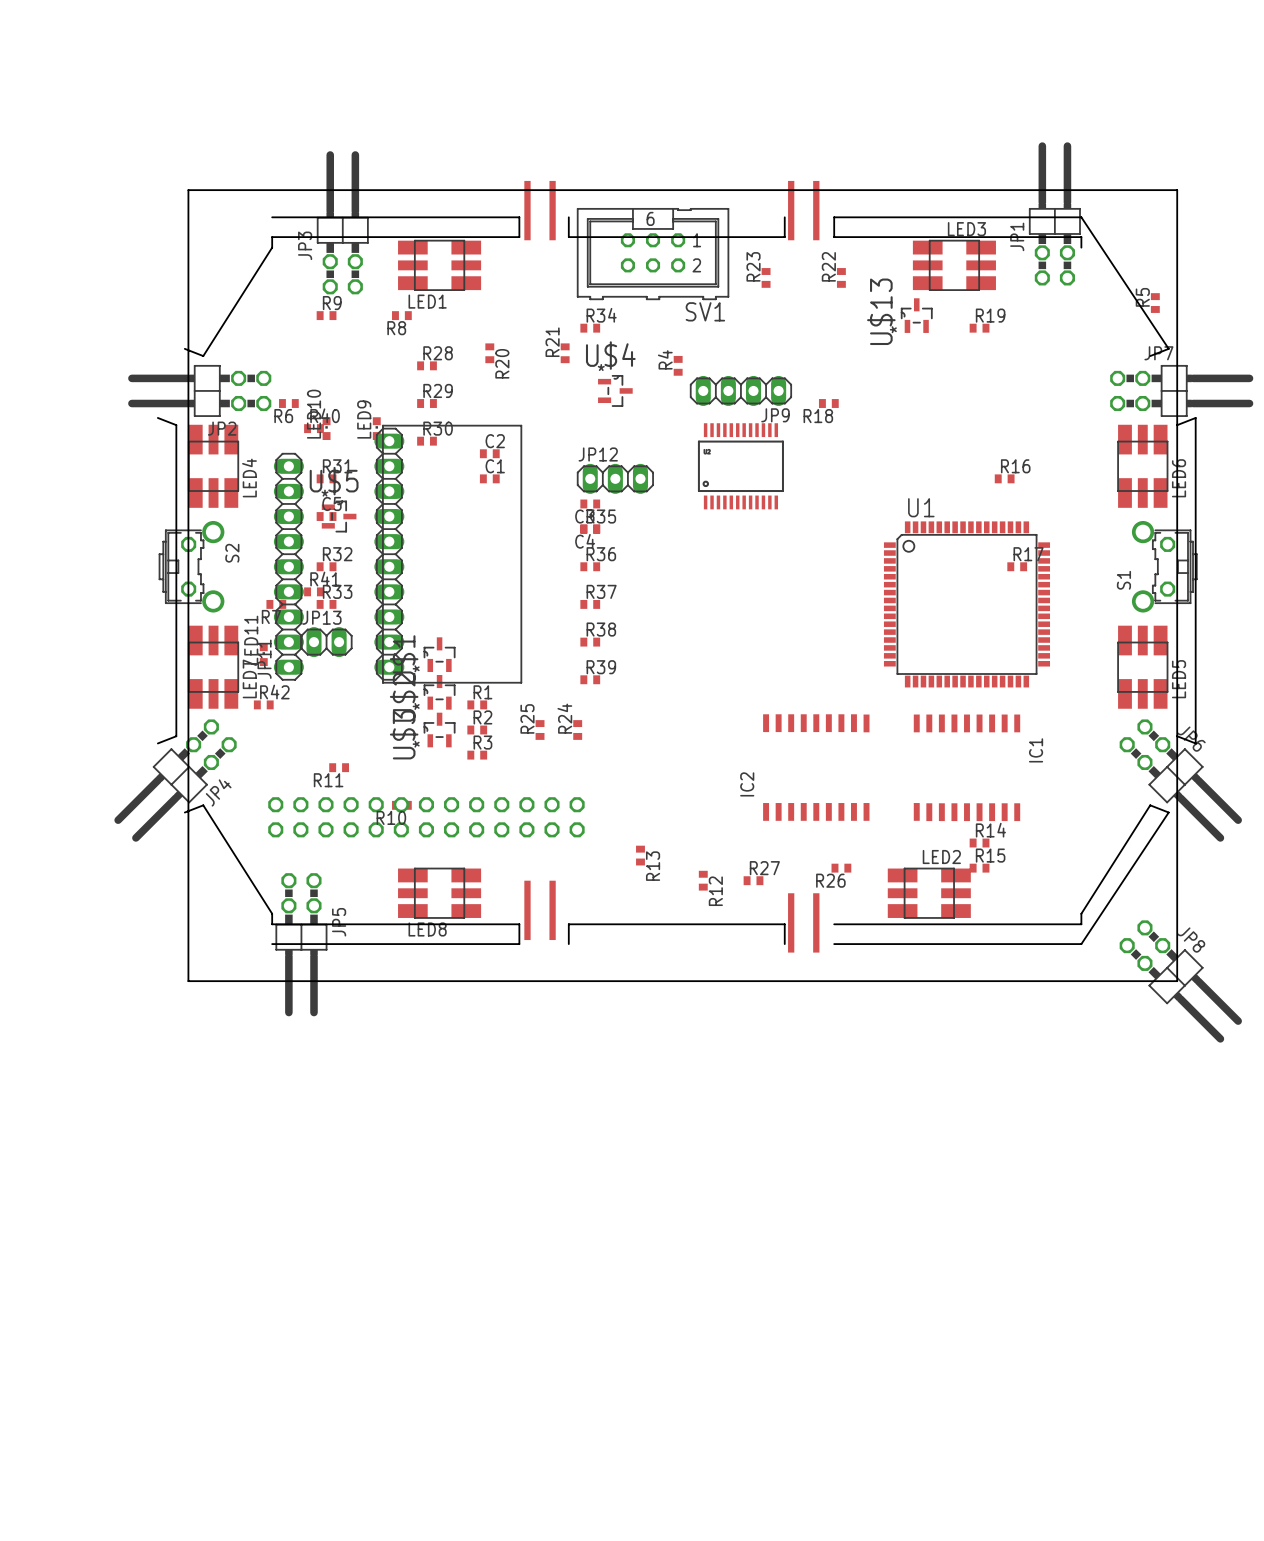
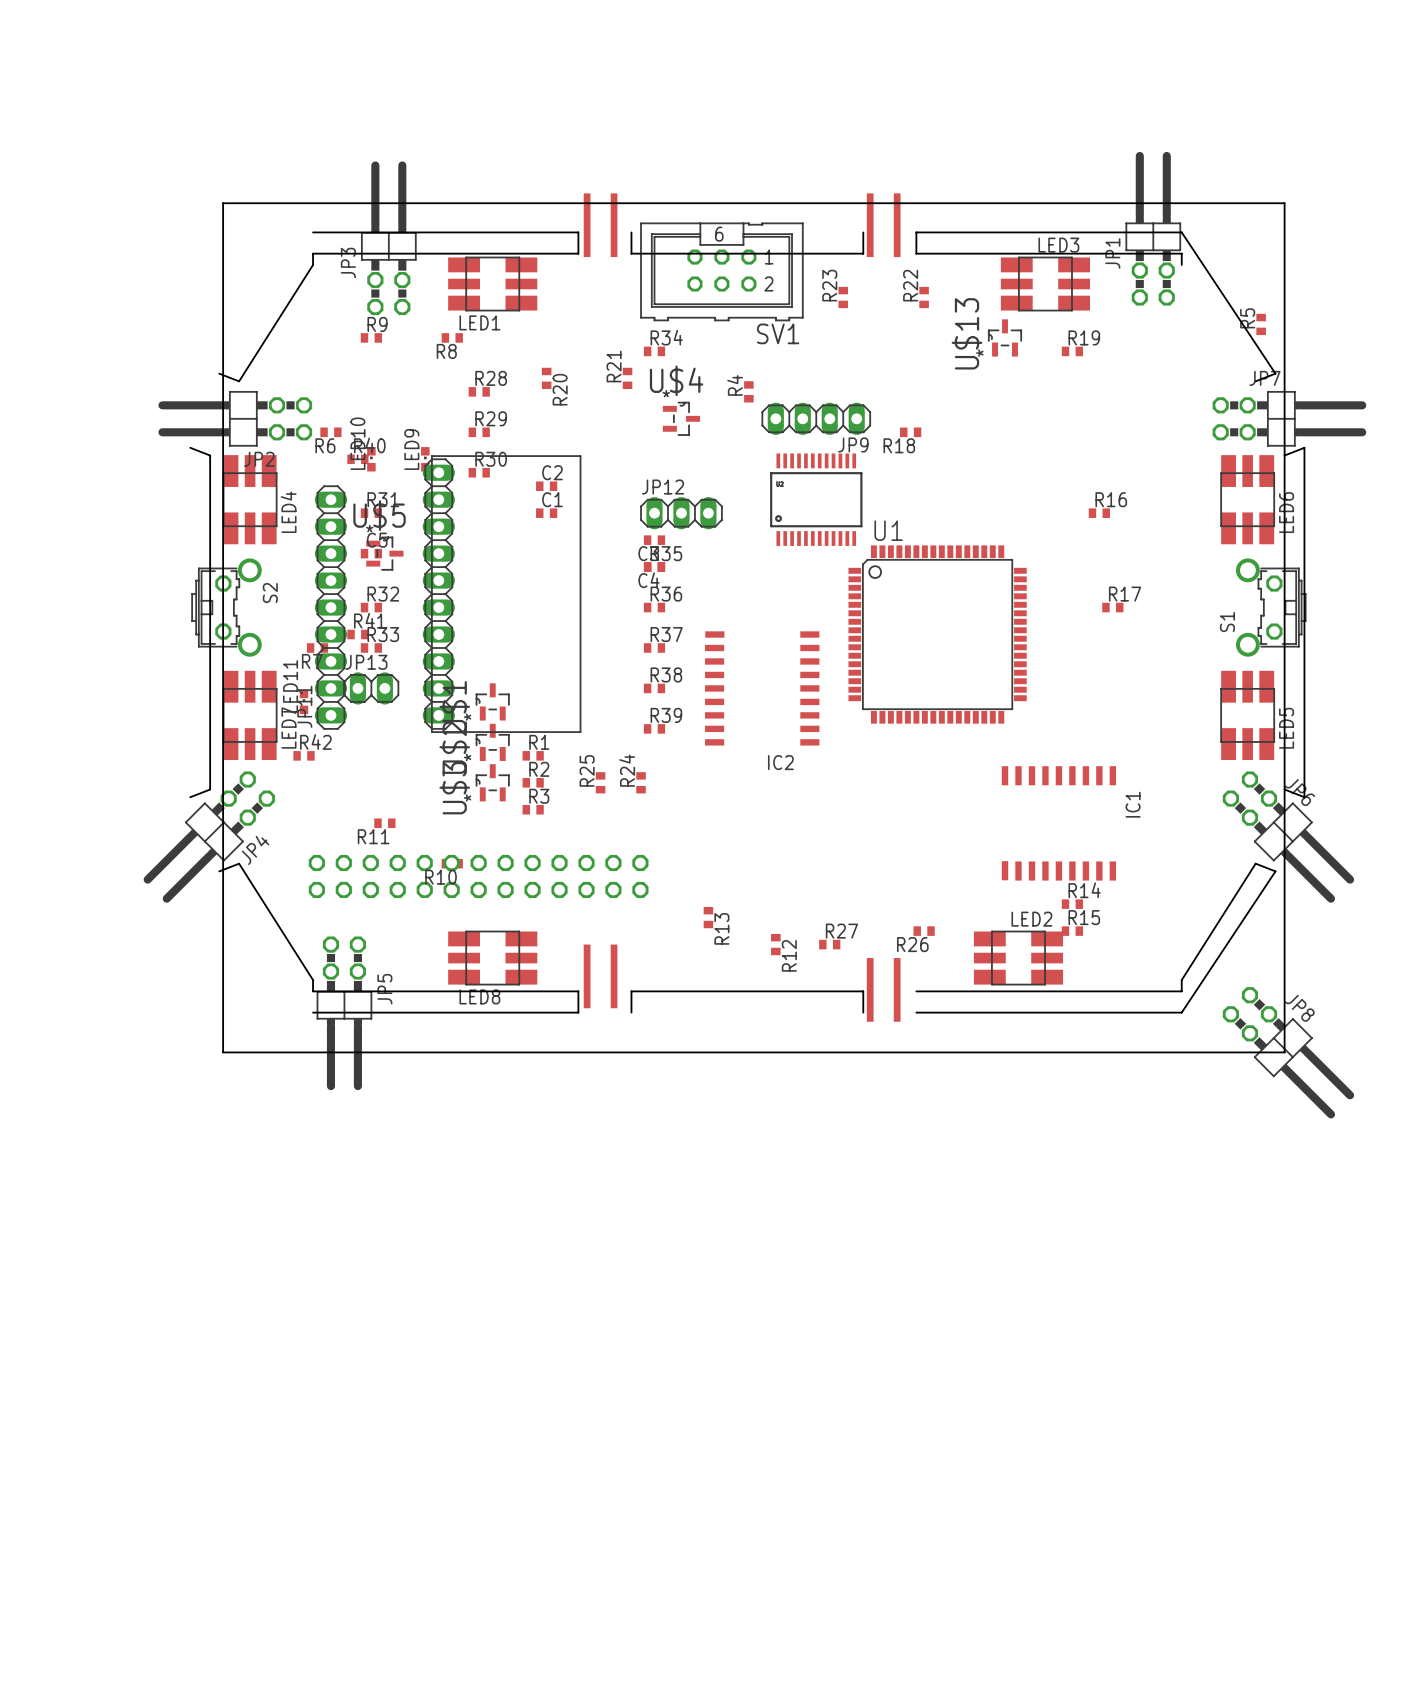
U1 position: (966, 604) -> (937, 634)
IC2 rotation: 0° (816, 767) -> 90° counterclockwise (762, 688)
IC2 position: (816, 767) -> (762, 688)

